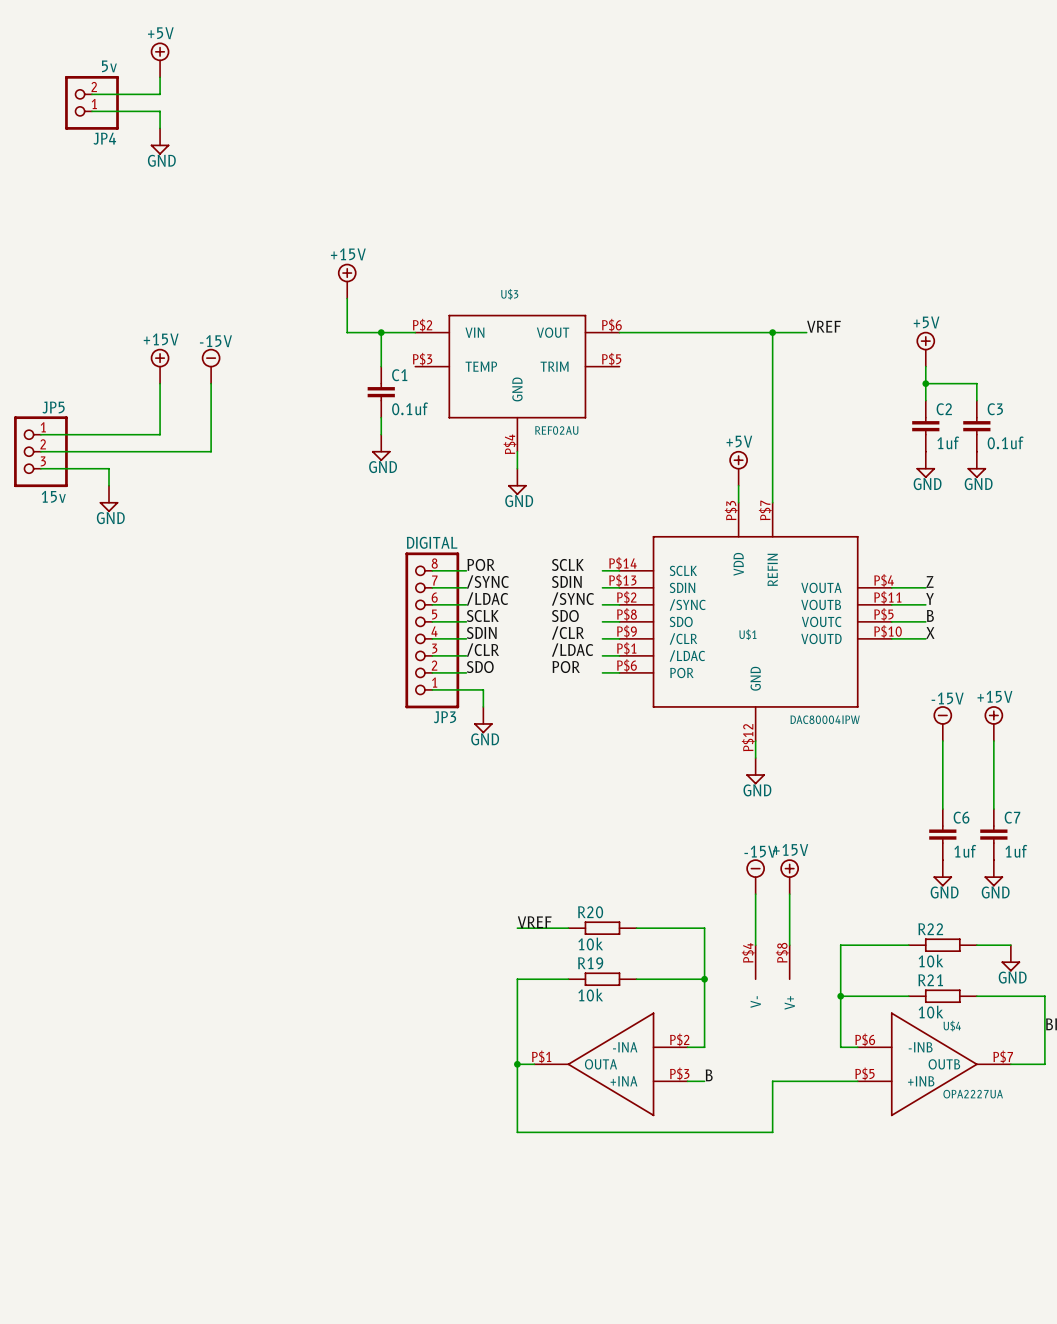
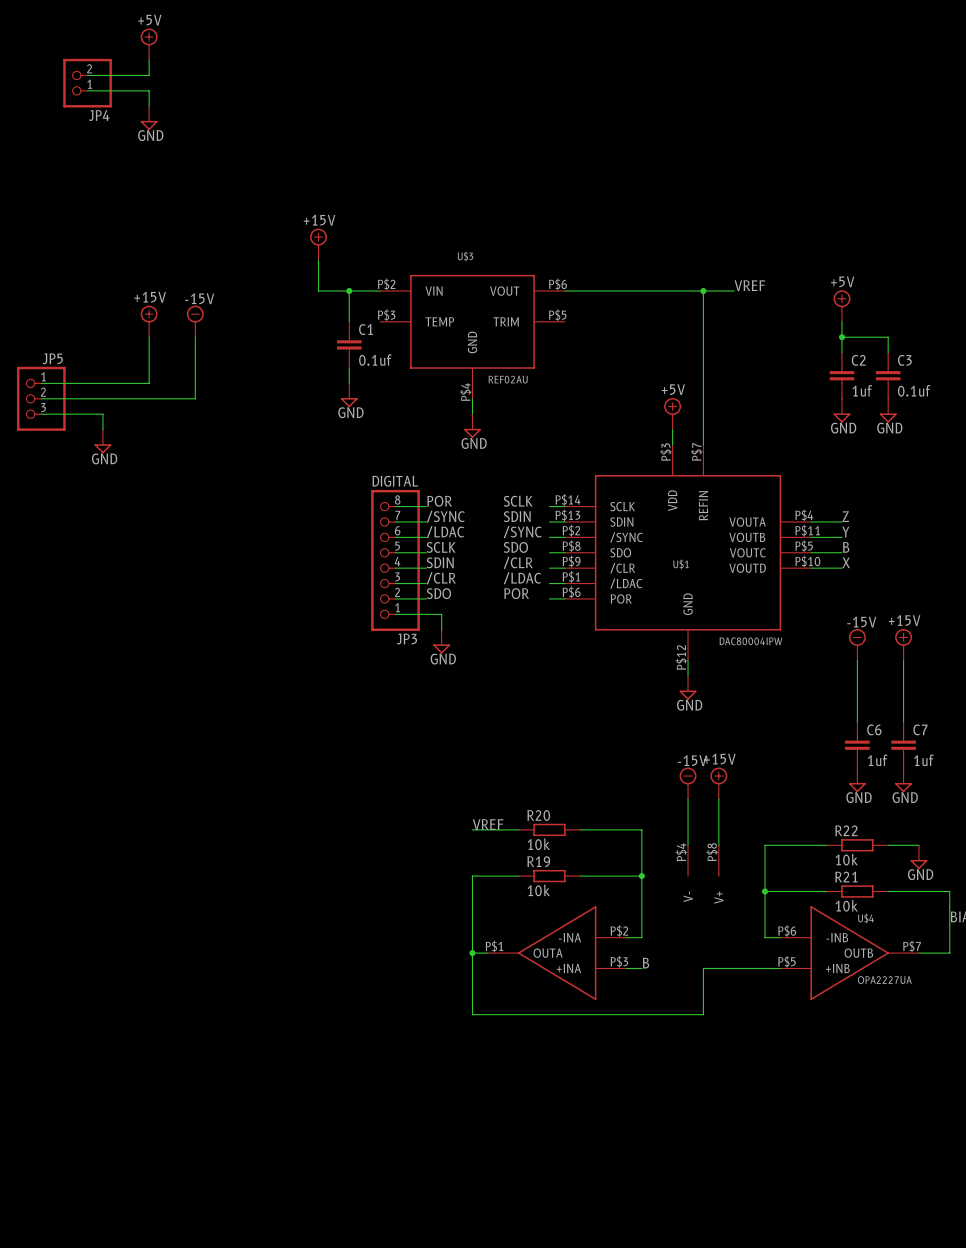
JP4 value: 5v (109, 66) -> none
JP5 value: 15v (53, 496) -> none

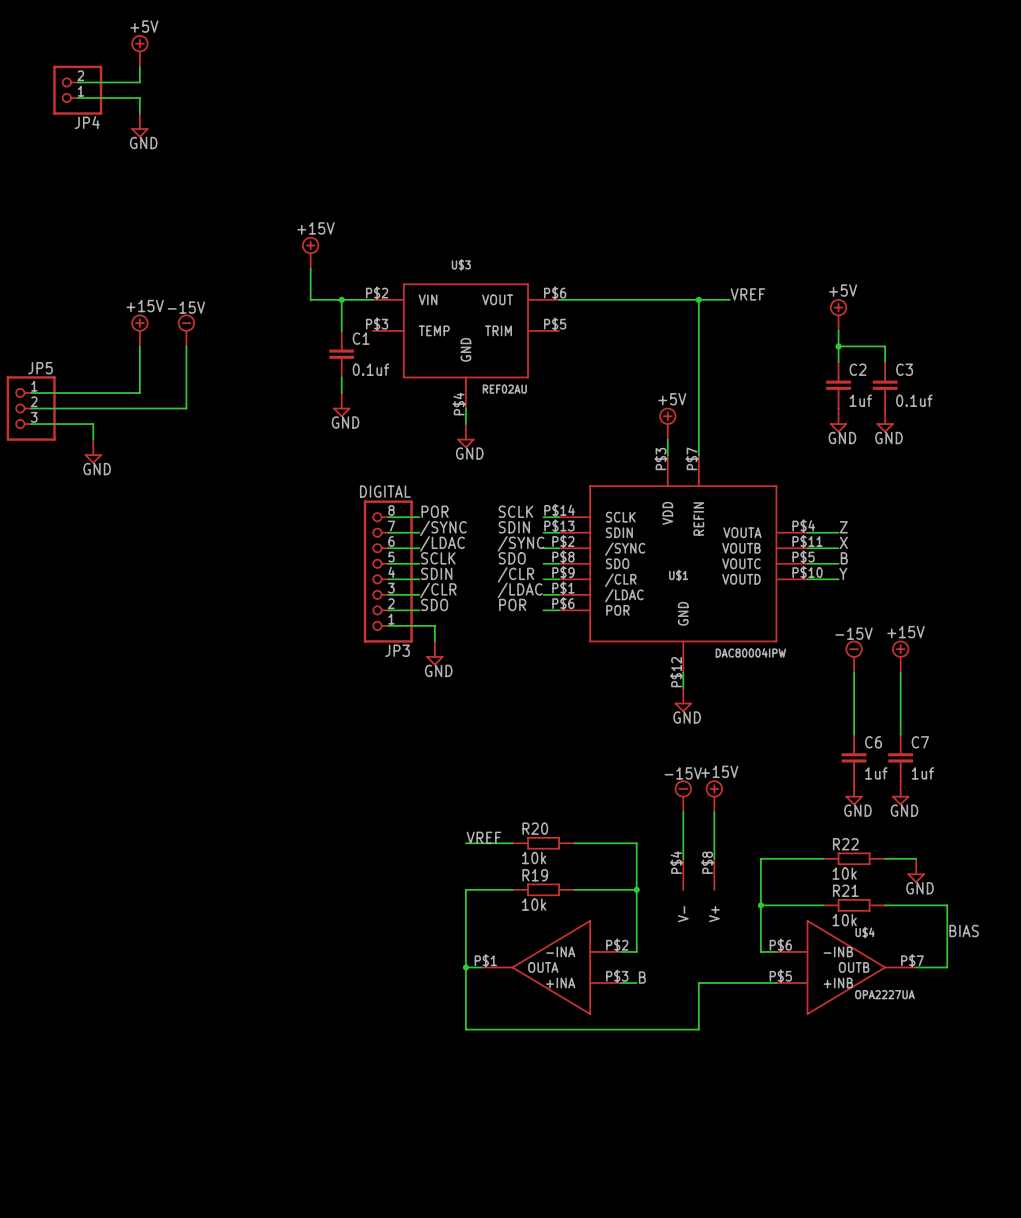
label: Y (845, 531) -> X (843, 542)
label: X (846, 562) -> Y (843, 573)

